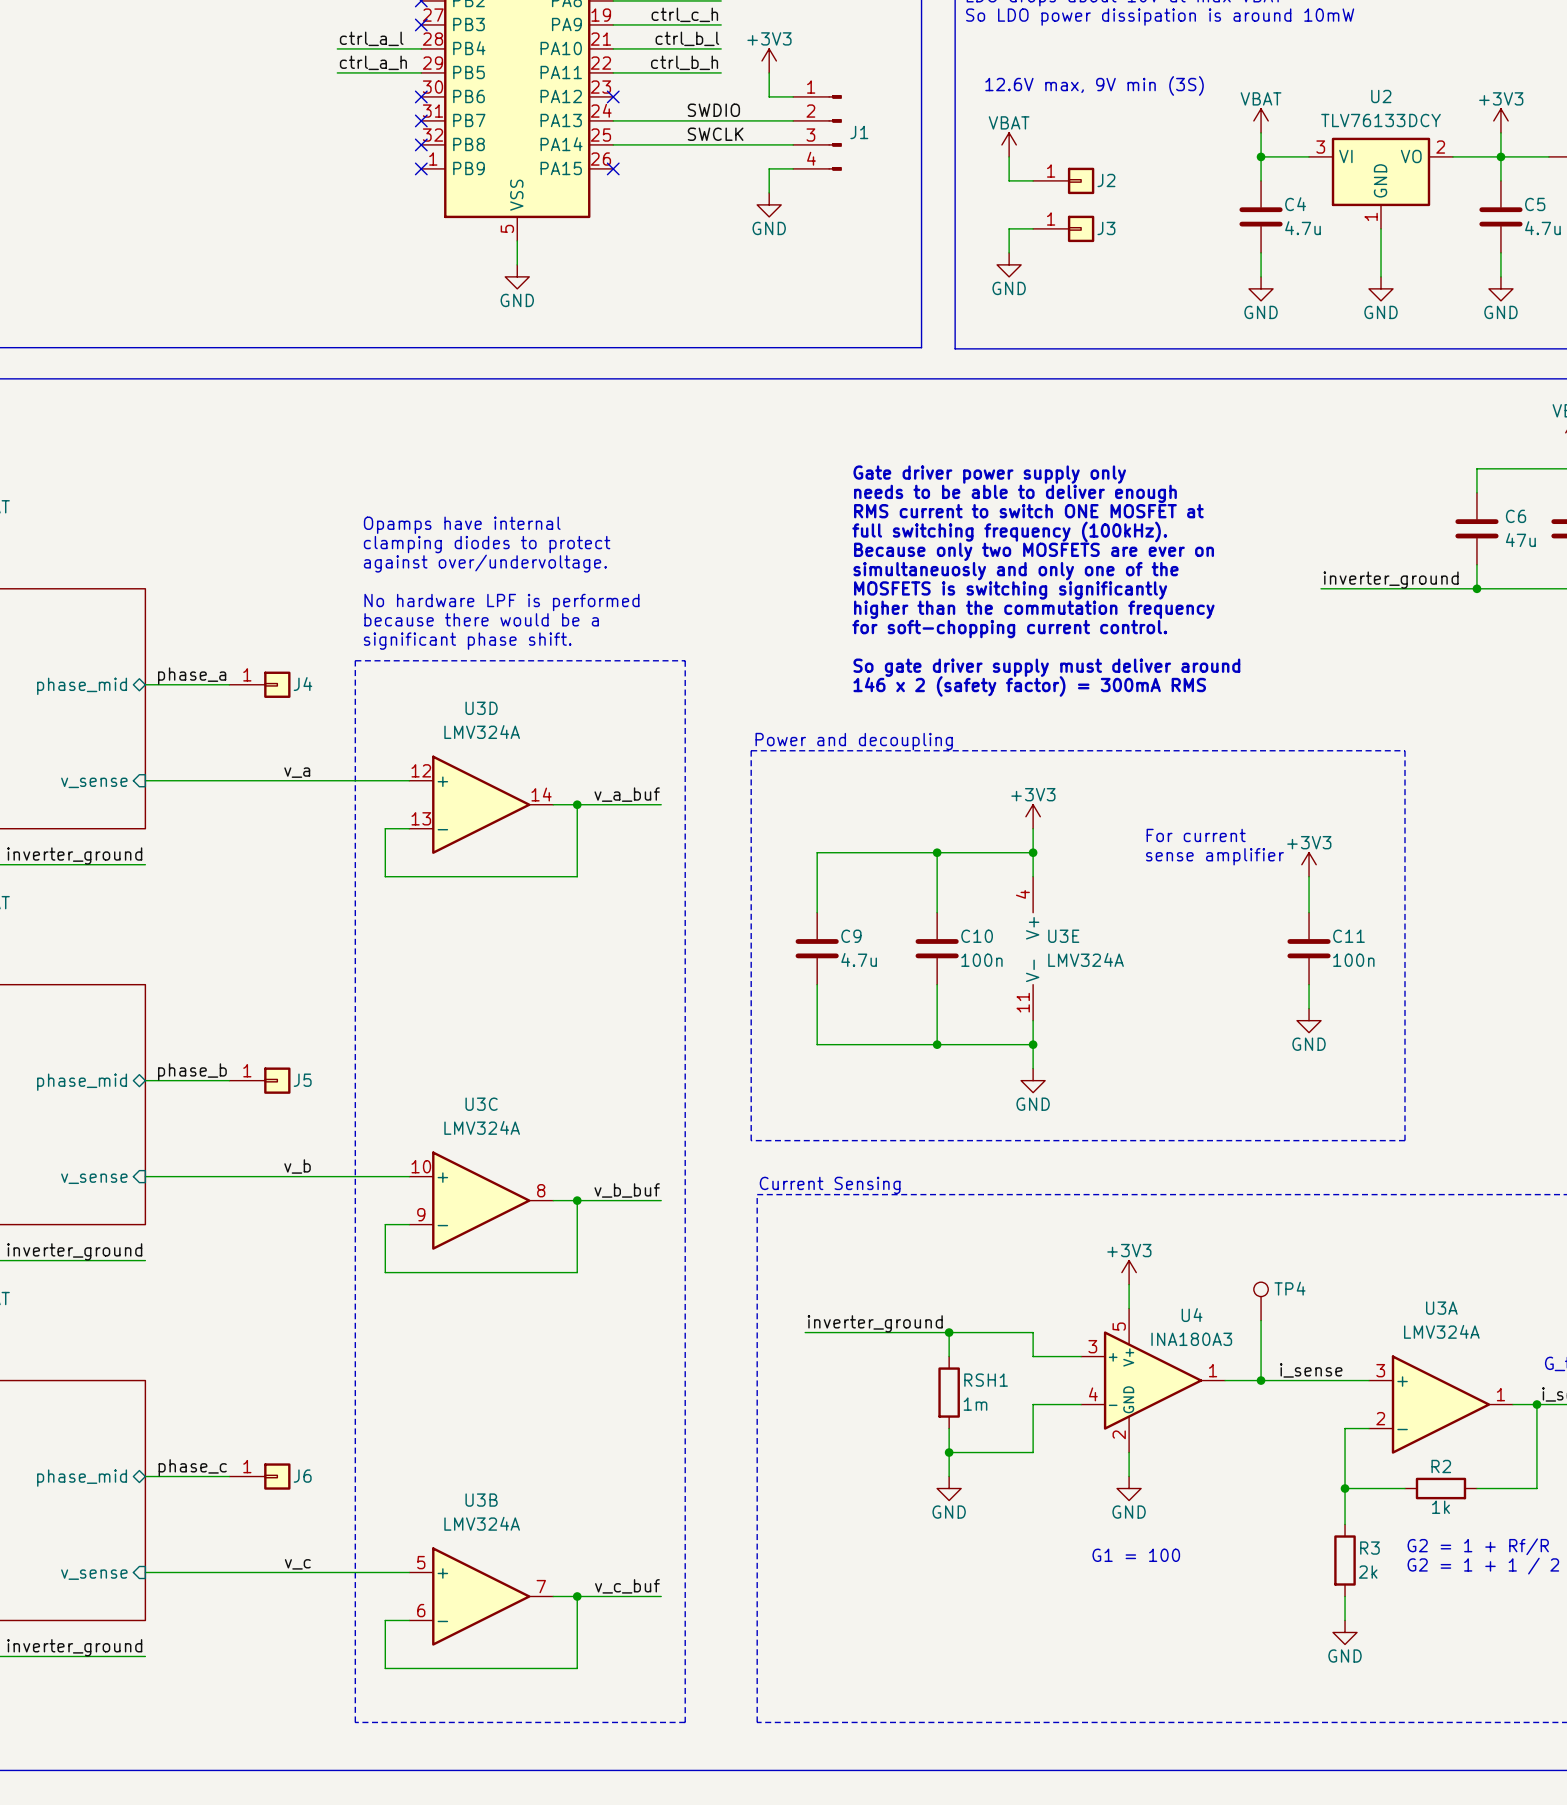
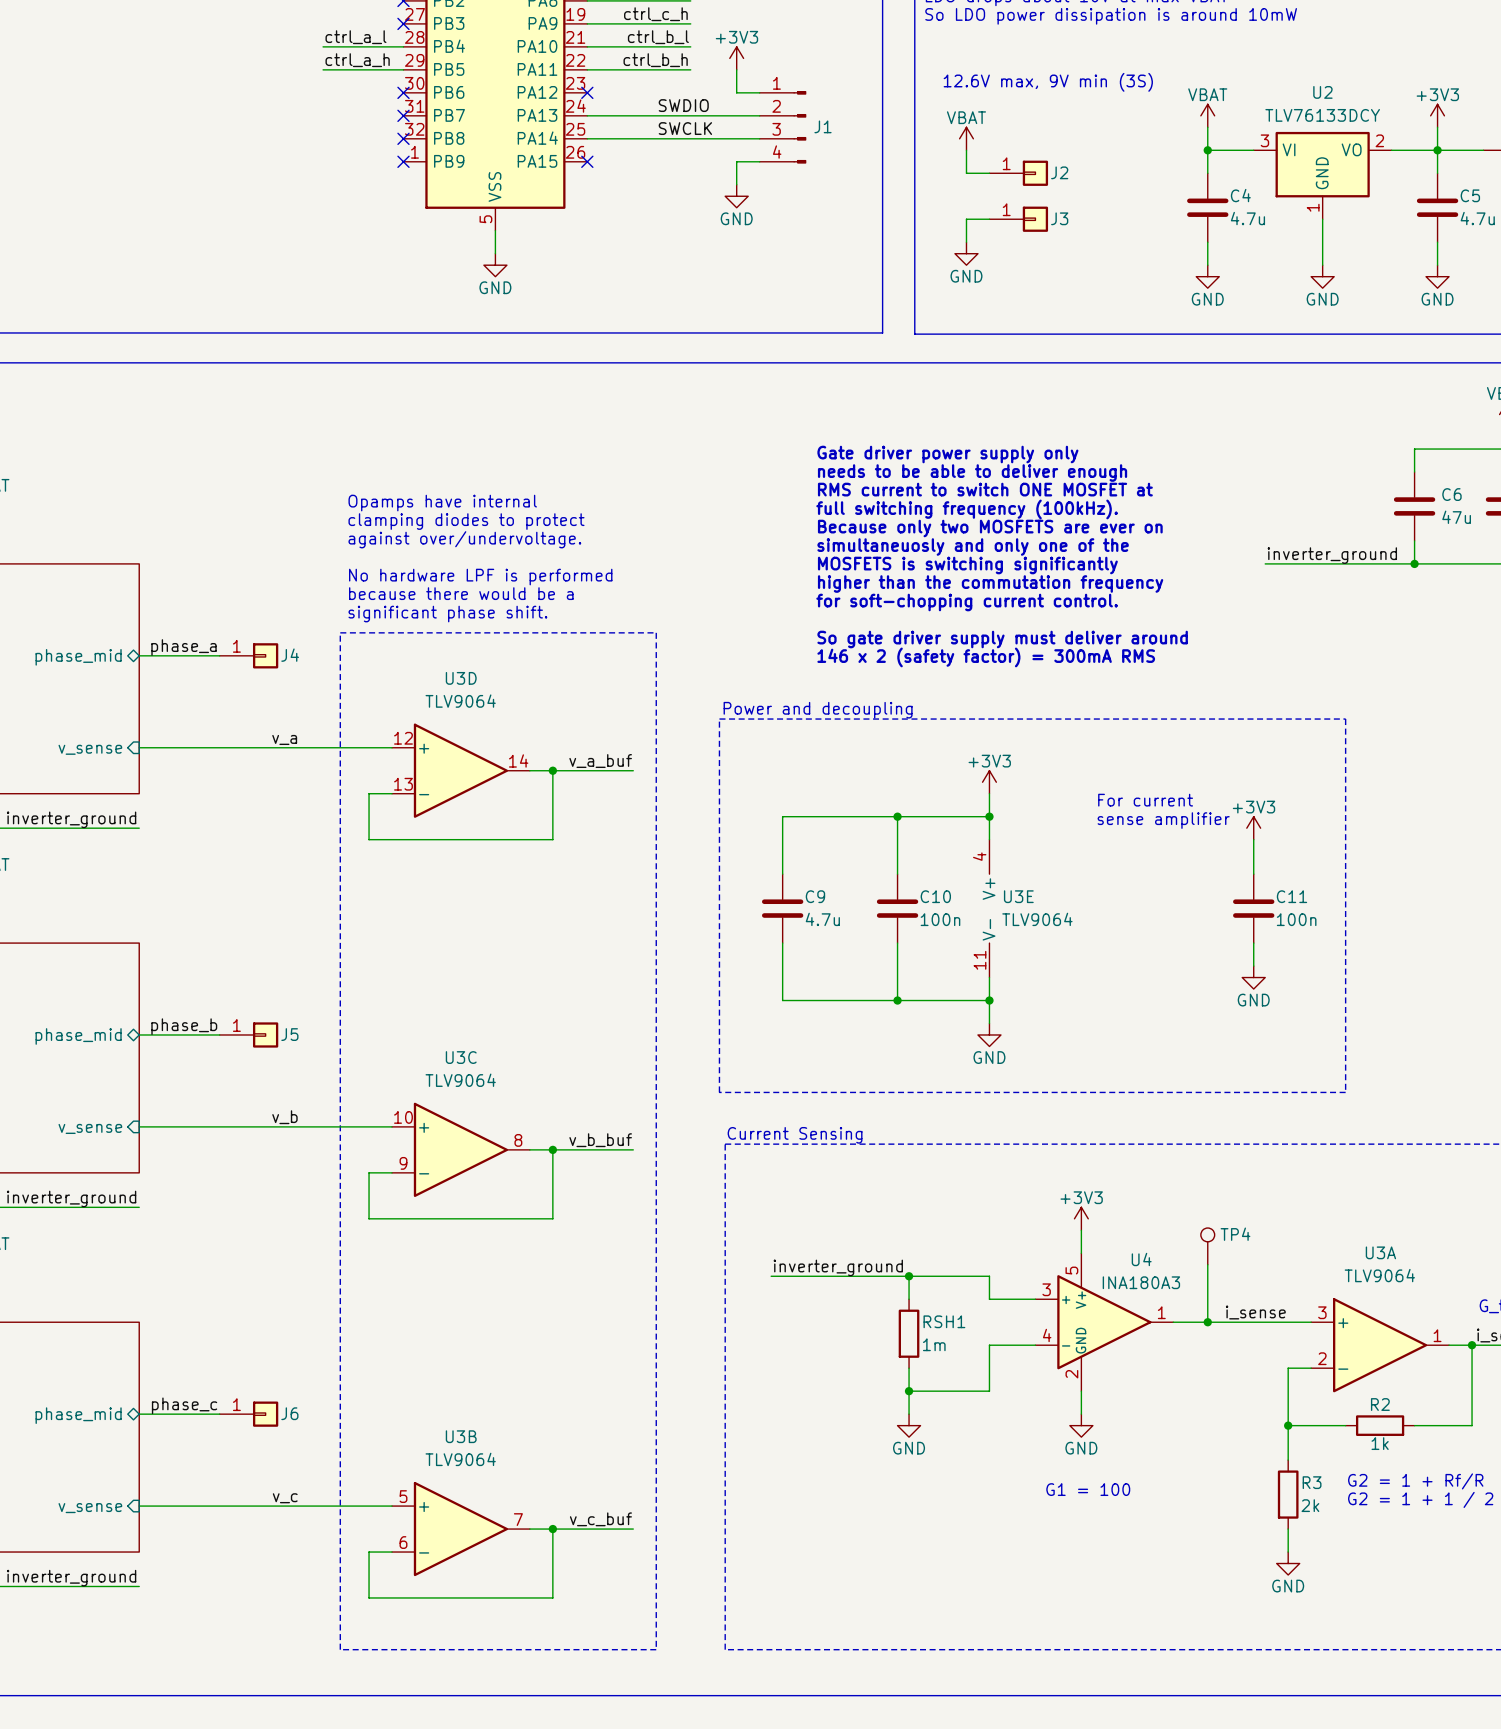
U3D value: LMV324A (482, 732) -> TLV9064 (460, 701)
U3E value: LMV324A (1086, 959) -> TLV9064 (1037, 919)
U3C value: LMV324A (482, 1127) -> TLV9064 (460, 1080)
U3A value: LMV324A (1441, 1331) -> TLV9064 (1379, 1275)
U3B value: LMV324A (482, 1523) -> TLV9064 (460, 1459)

